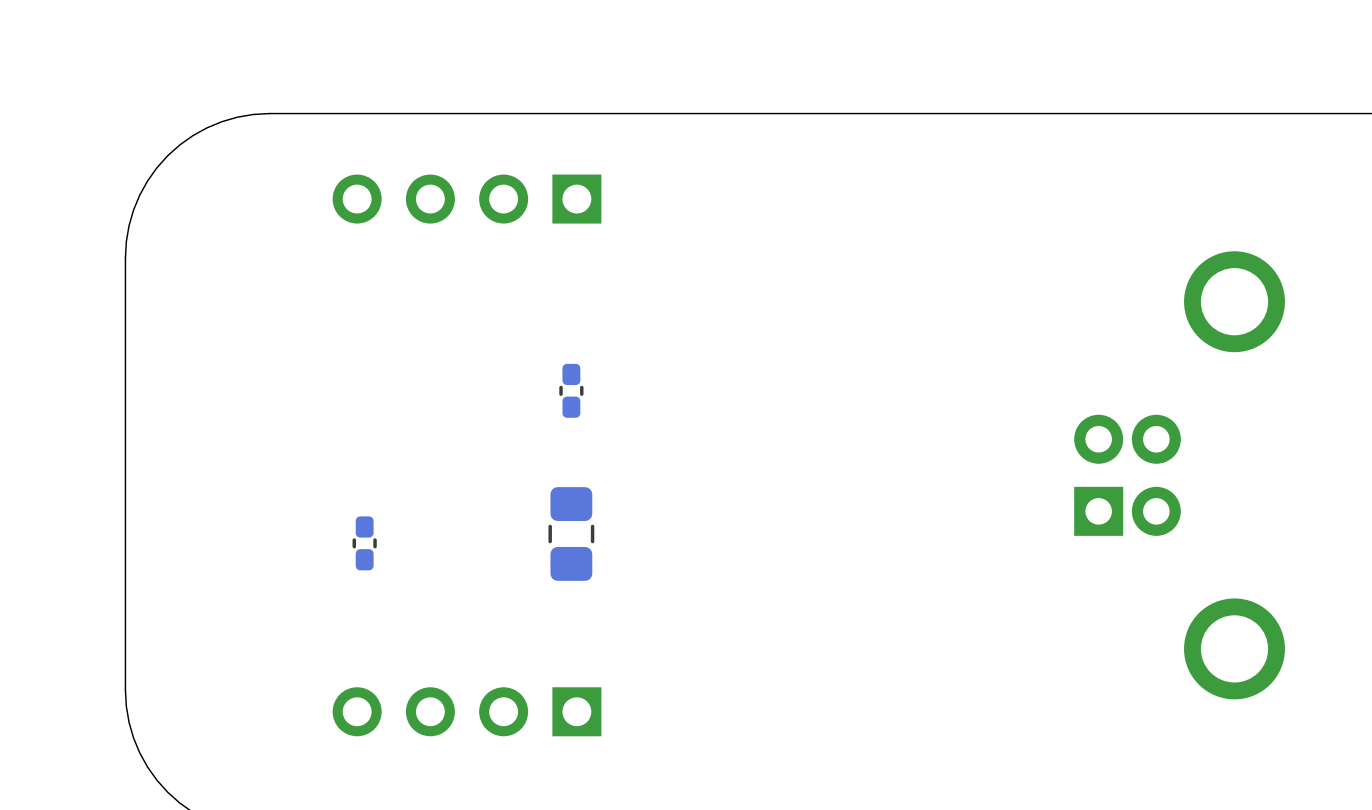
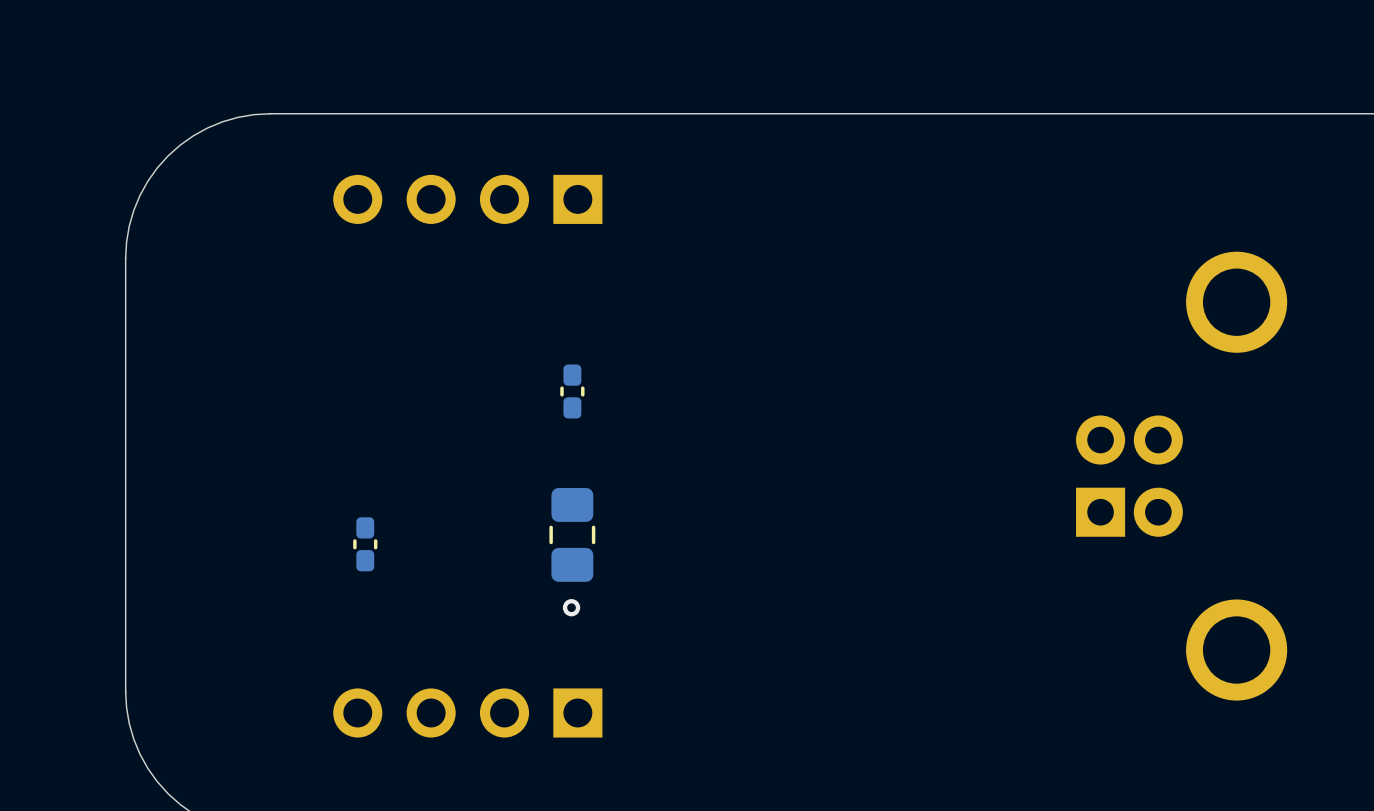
via: none -> (571, 607)

